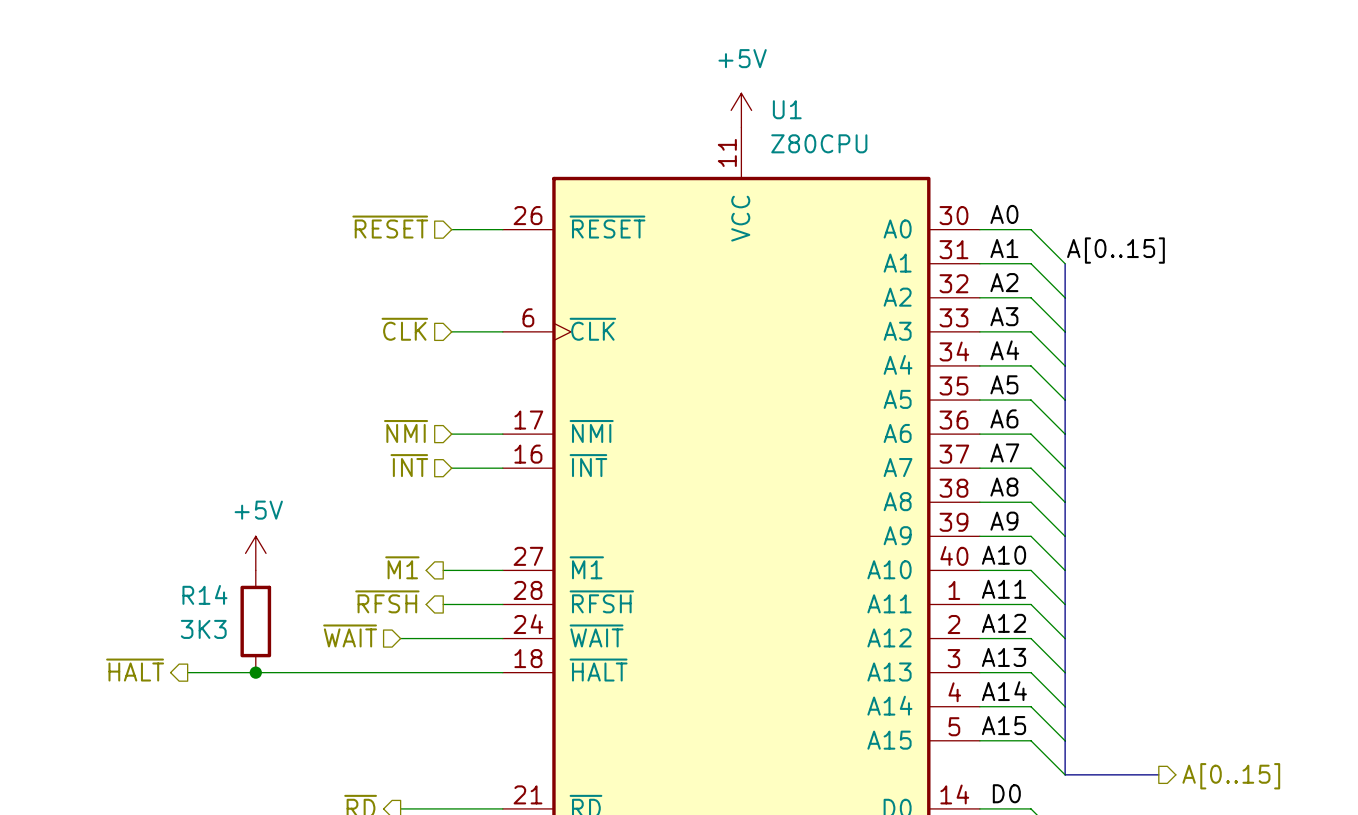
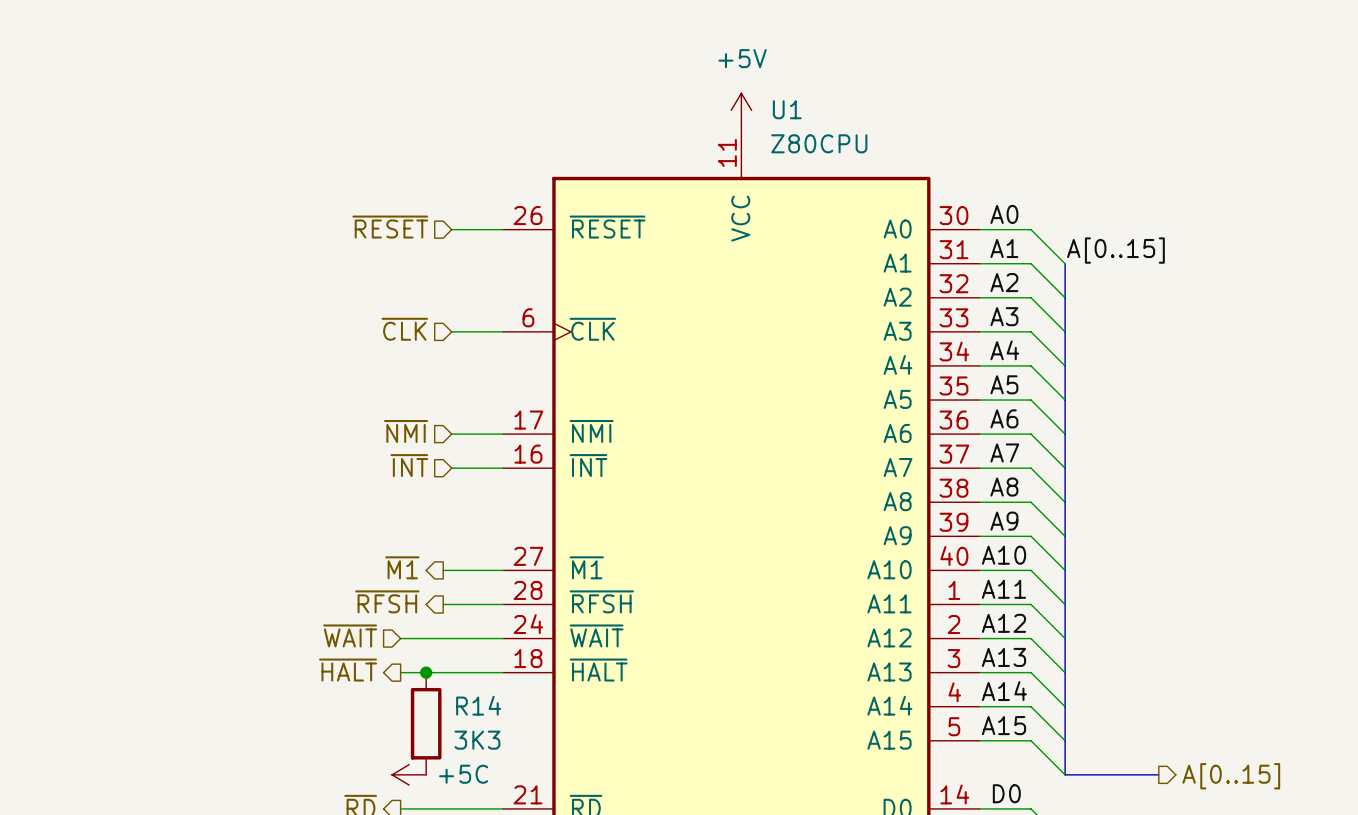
power symbol: +5V (255, 553) -> none
R14 name position: R14 (204, 594) -> R14 (478, 705)
R14 position: (255, 621) -> (426, 723)
R14 value position: 3K3 (203, 629) -> 3K3 (477, 740)
hierarchical label position: ~{HALT} (135, 670) -> ~{HALT} (348, 670)
wire: (187, 672) (400, 672) -> none
junction: (255, 672) -> none
junction: none -> (426, 672)
power symbol: none -> +5C (409, 774)

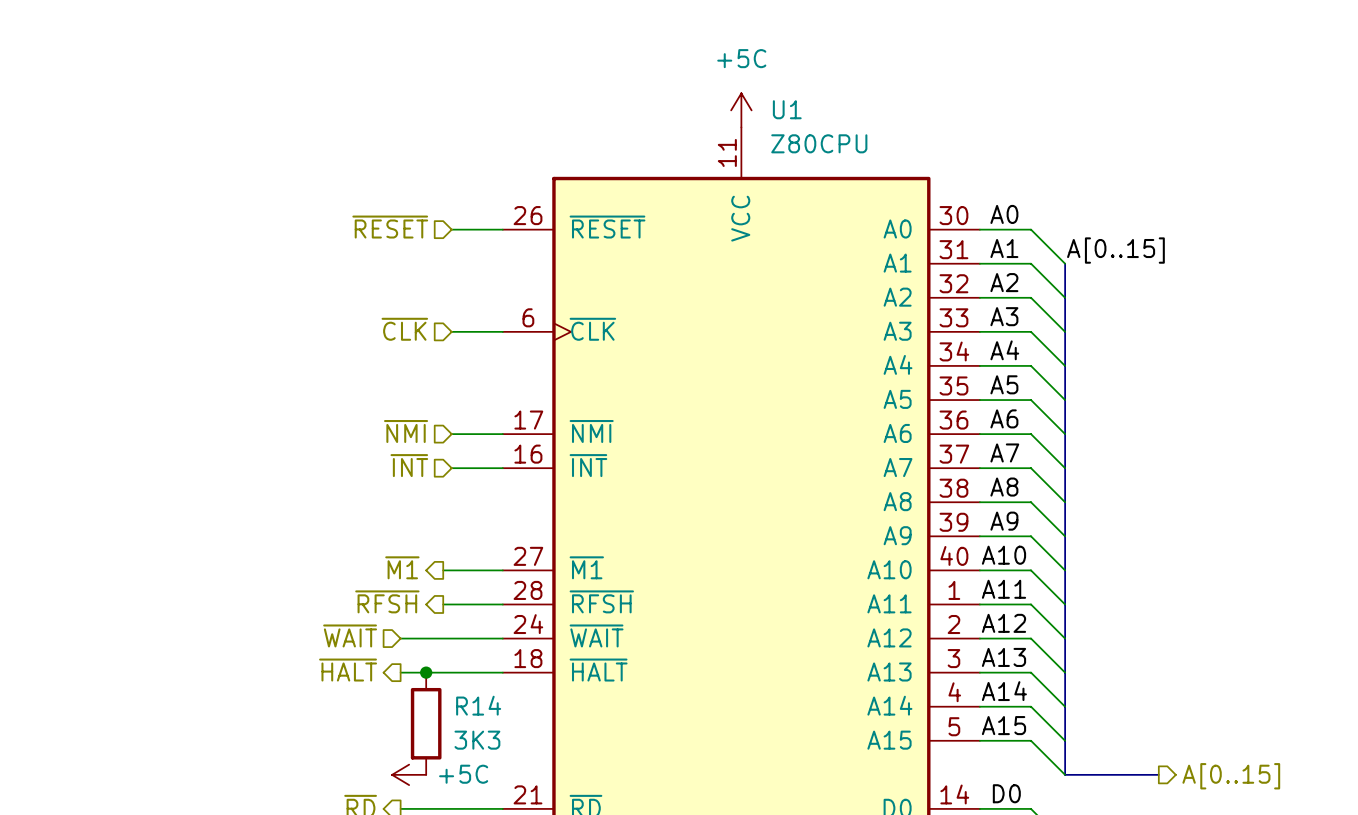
power symbol: +5V (741, 110) -> +5C (741, 110)

